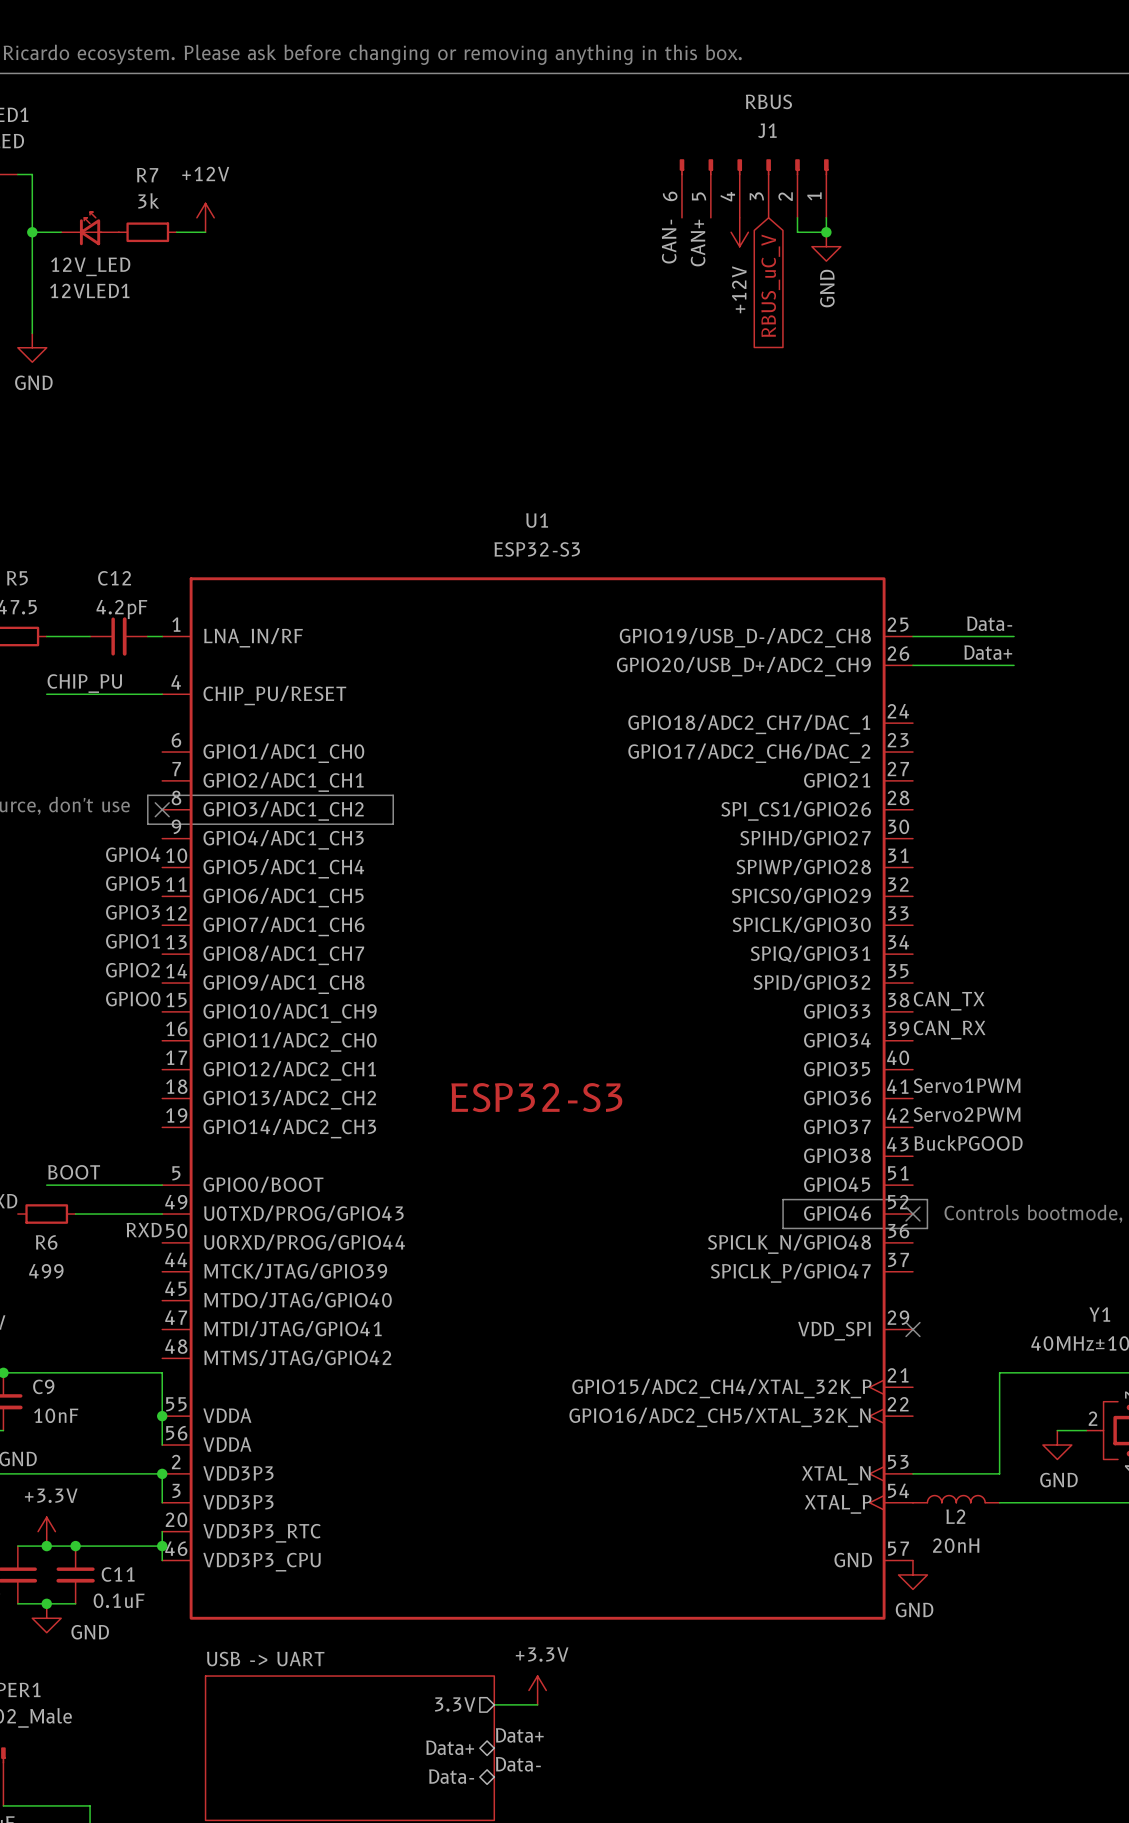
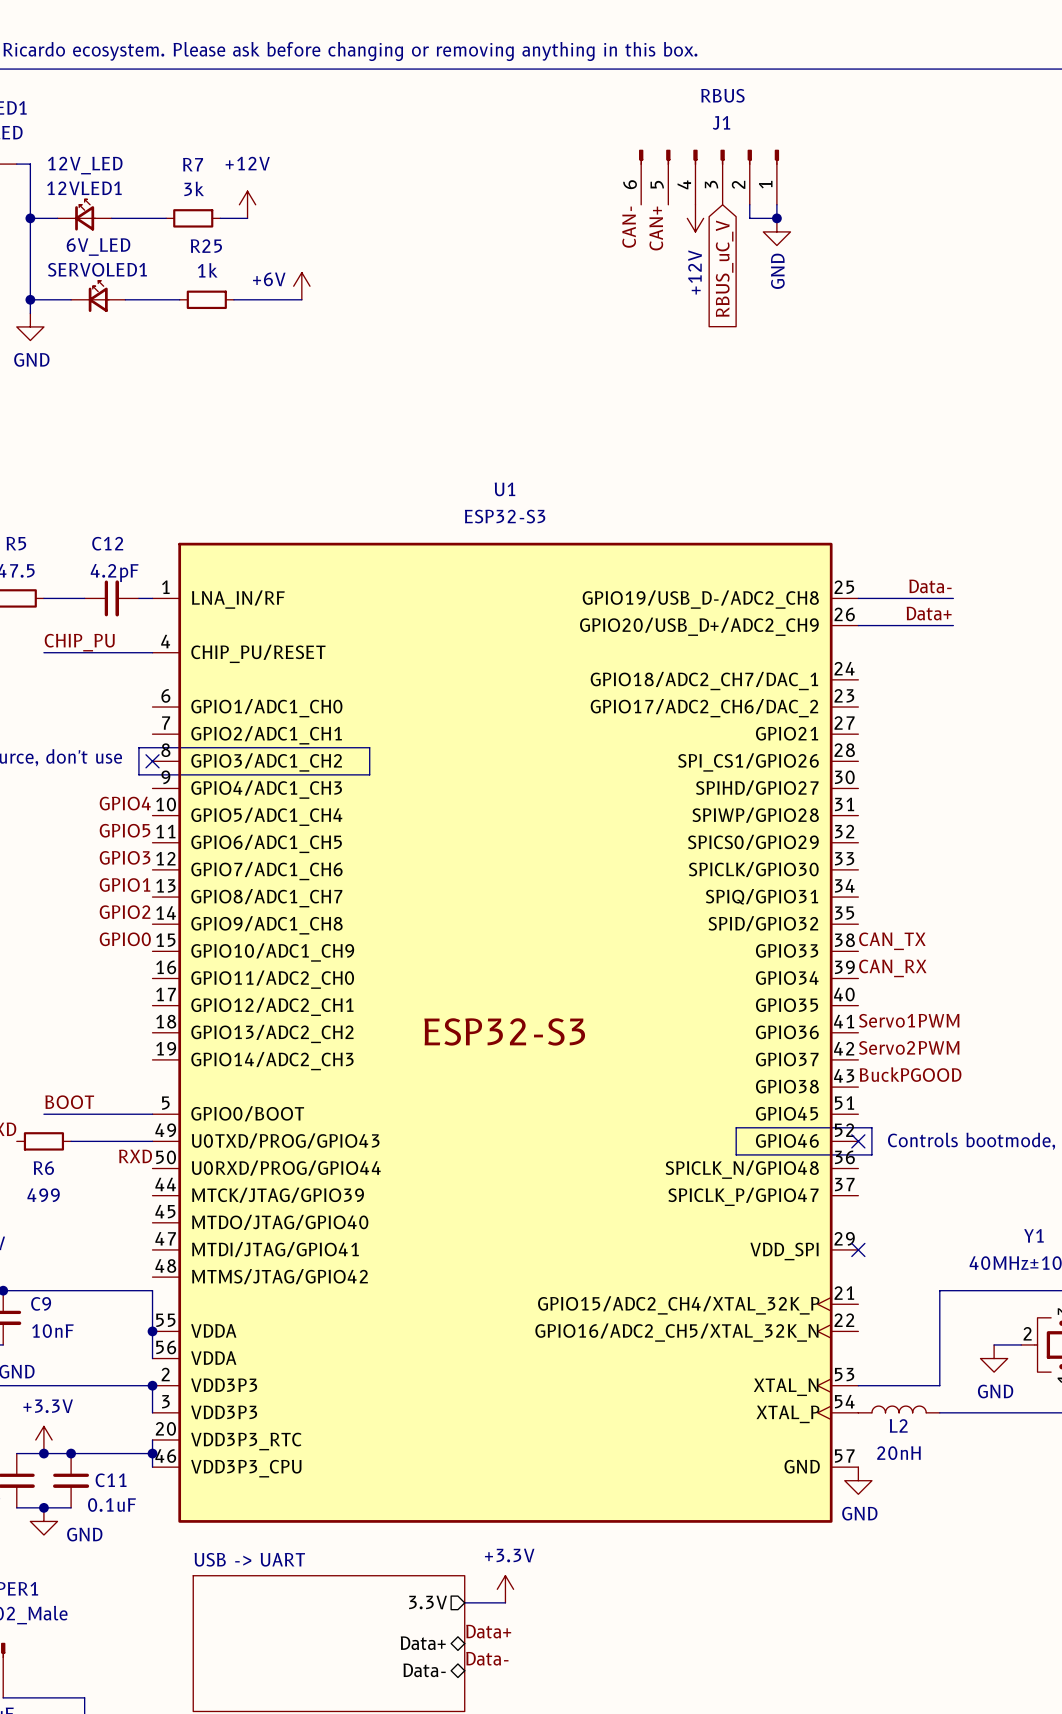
power symbol position: +12V (205, 217) -> +12V (247, 204)
R7 position: (147, 232) -> (193, 218)
wire: (176, 232) (205, 232) -> (166, 218) (111, 218)
wire: none -> (220, 218) (247, 218)
12VLED1 value position: 12V_LED (90, 266) -> 12V_LED (85, 165)
12VLED1 name position: 12VLED1 (89, 291) -> 12VLED1 (84, 188)
power symbol: none -> +6V (301, 286)
SERVOLED1: none -> 6V_LED (98, 296)
wire: none -> (30, 299) (71, 299)
junction: none -> (30, 299)
wire: none -> (125, 299) (179, 299)
R25: none -> 1k (206, 299)
wire: none -> (233, 299) (301, 299)

